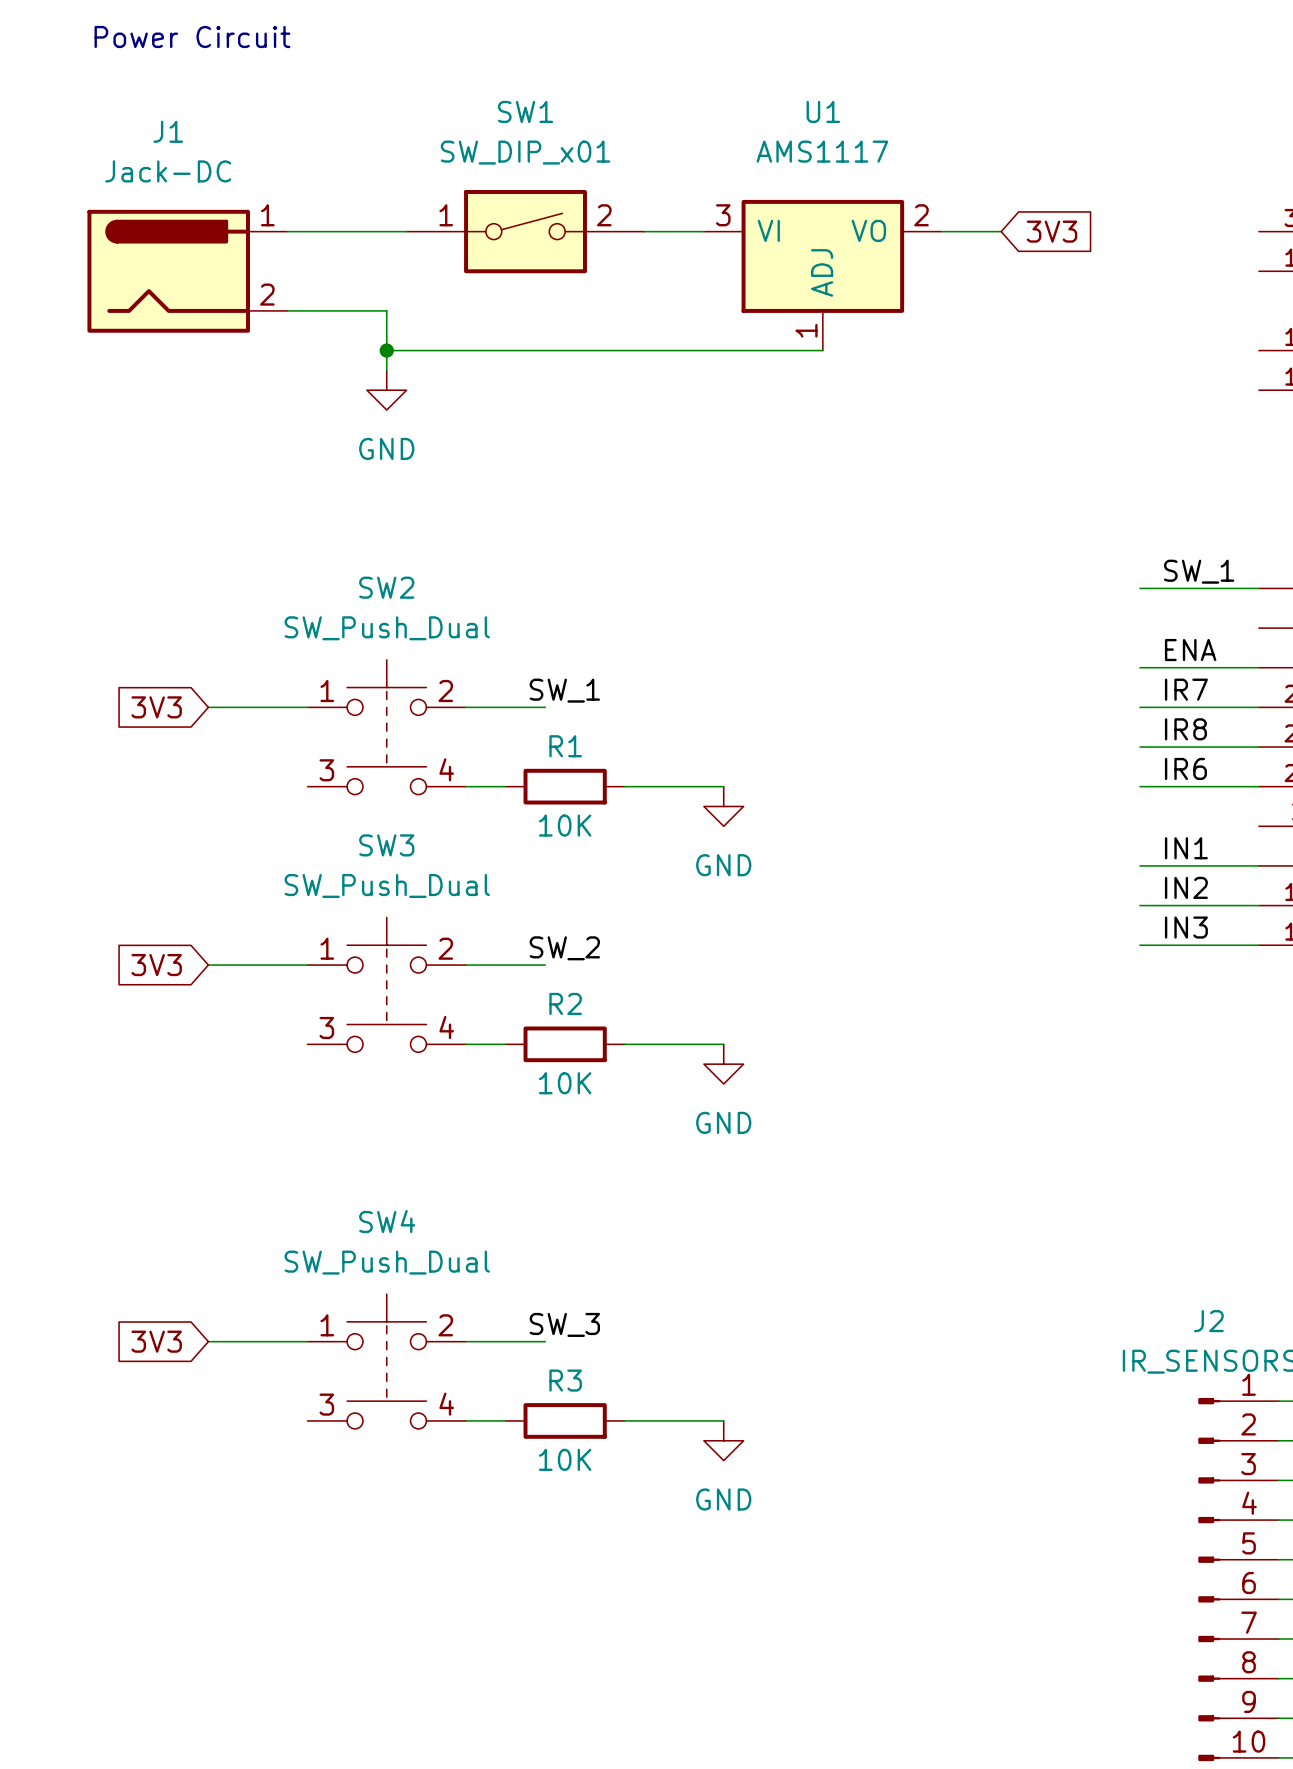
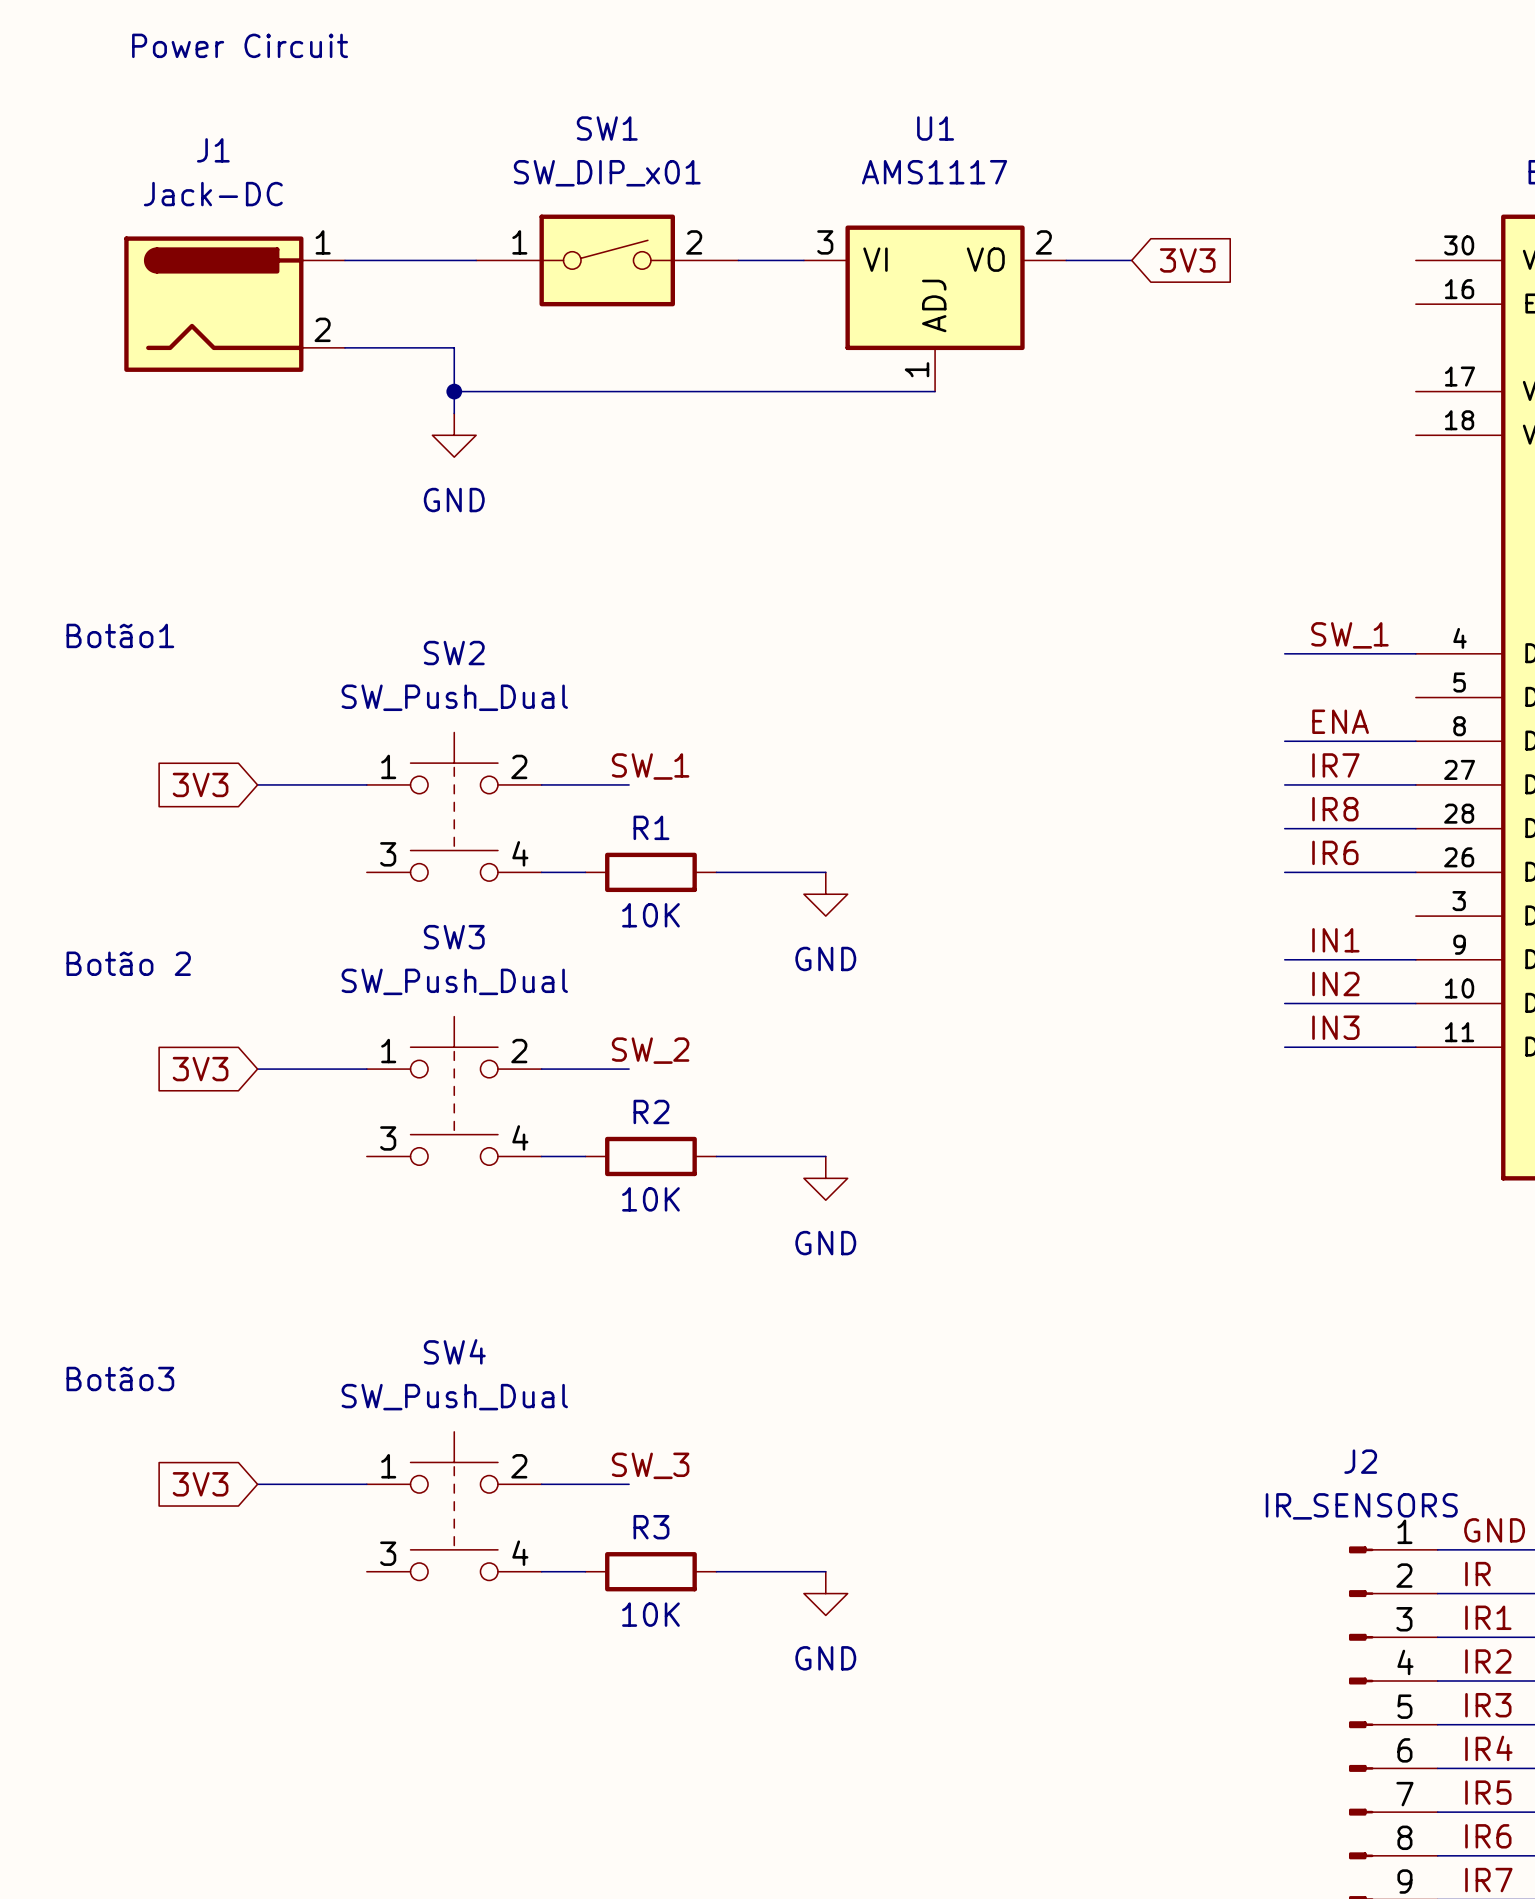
text: none -> Botão1 (120, 635)
text: none -> Botão 2 (128, 963)
text: none -> Botão3 (120, 1378)

